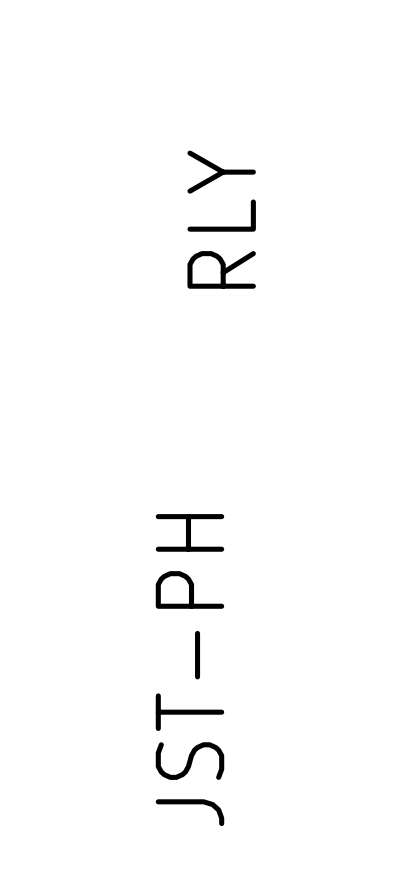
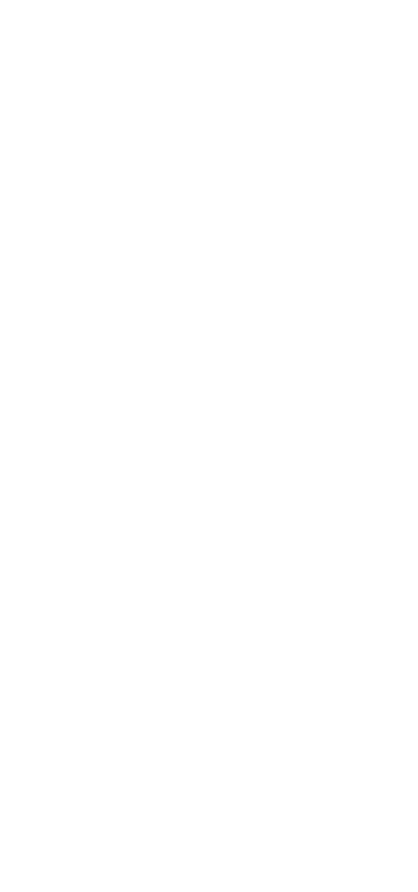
text: RLY (221, 219) -> none
text: JST-PH (189, 670) -> none

